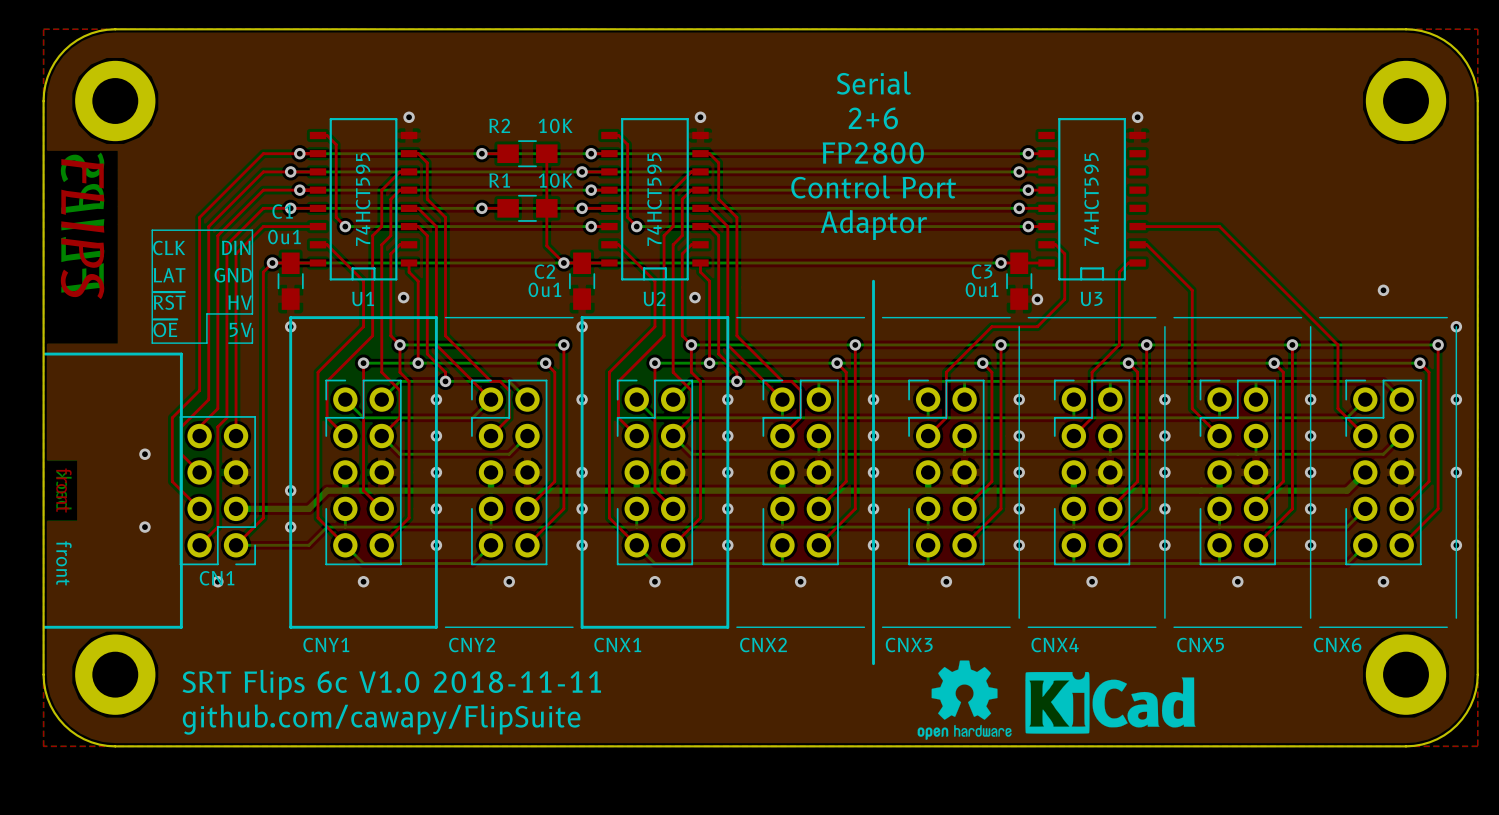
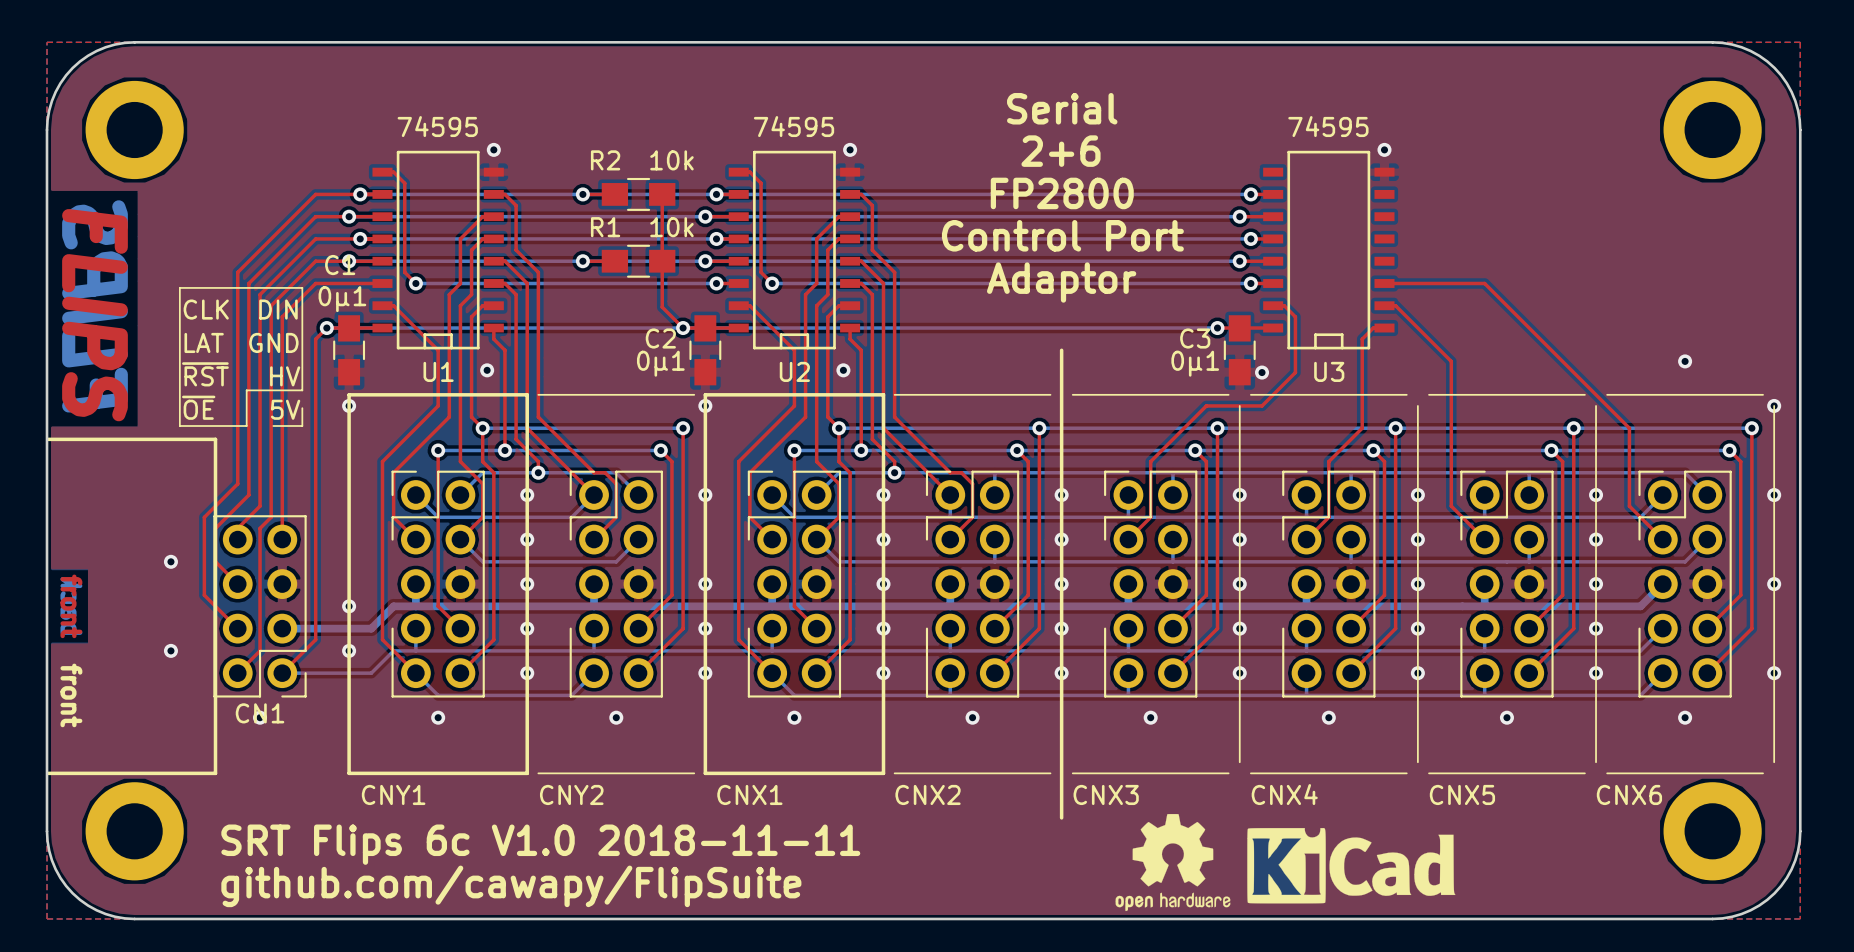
R2 value: 10K (555, 125) -> 10k (671, 160)
R1 value: 10K (555, 180) -> 10k (671, 227)
U1 value: 74HCT595 (363, 199) -> 74595 (437, 126)
U2 value: 74HCT595 (654, 199) -> 74595 (794, 126)
U3 value: 74HCT595 (1091, 199) -> 74595 (1328, 126)
C1 value: 0u1 (284, 237) -> 0µ1 (342, 299)
C2 value: 0u1 (544, 289) -> 0µ1 (660, 363)
C3 value: 0u1 (982, 289) -> 0µ1 (1195, 363)

